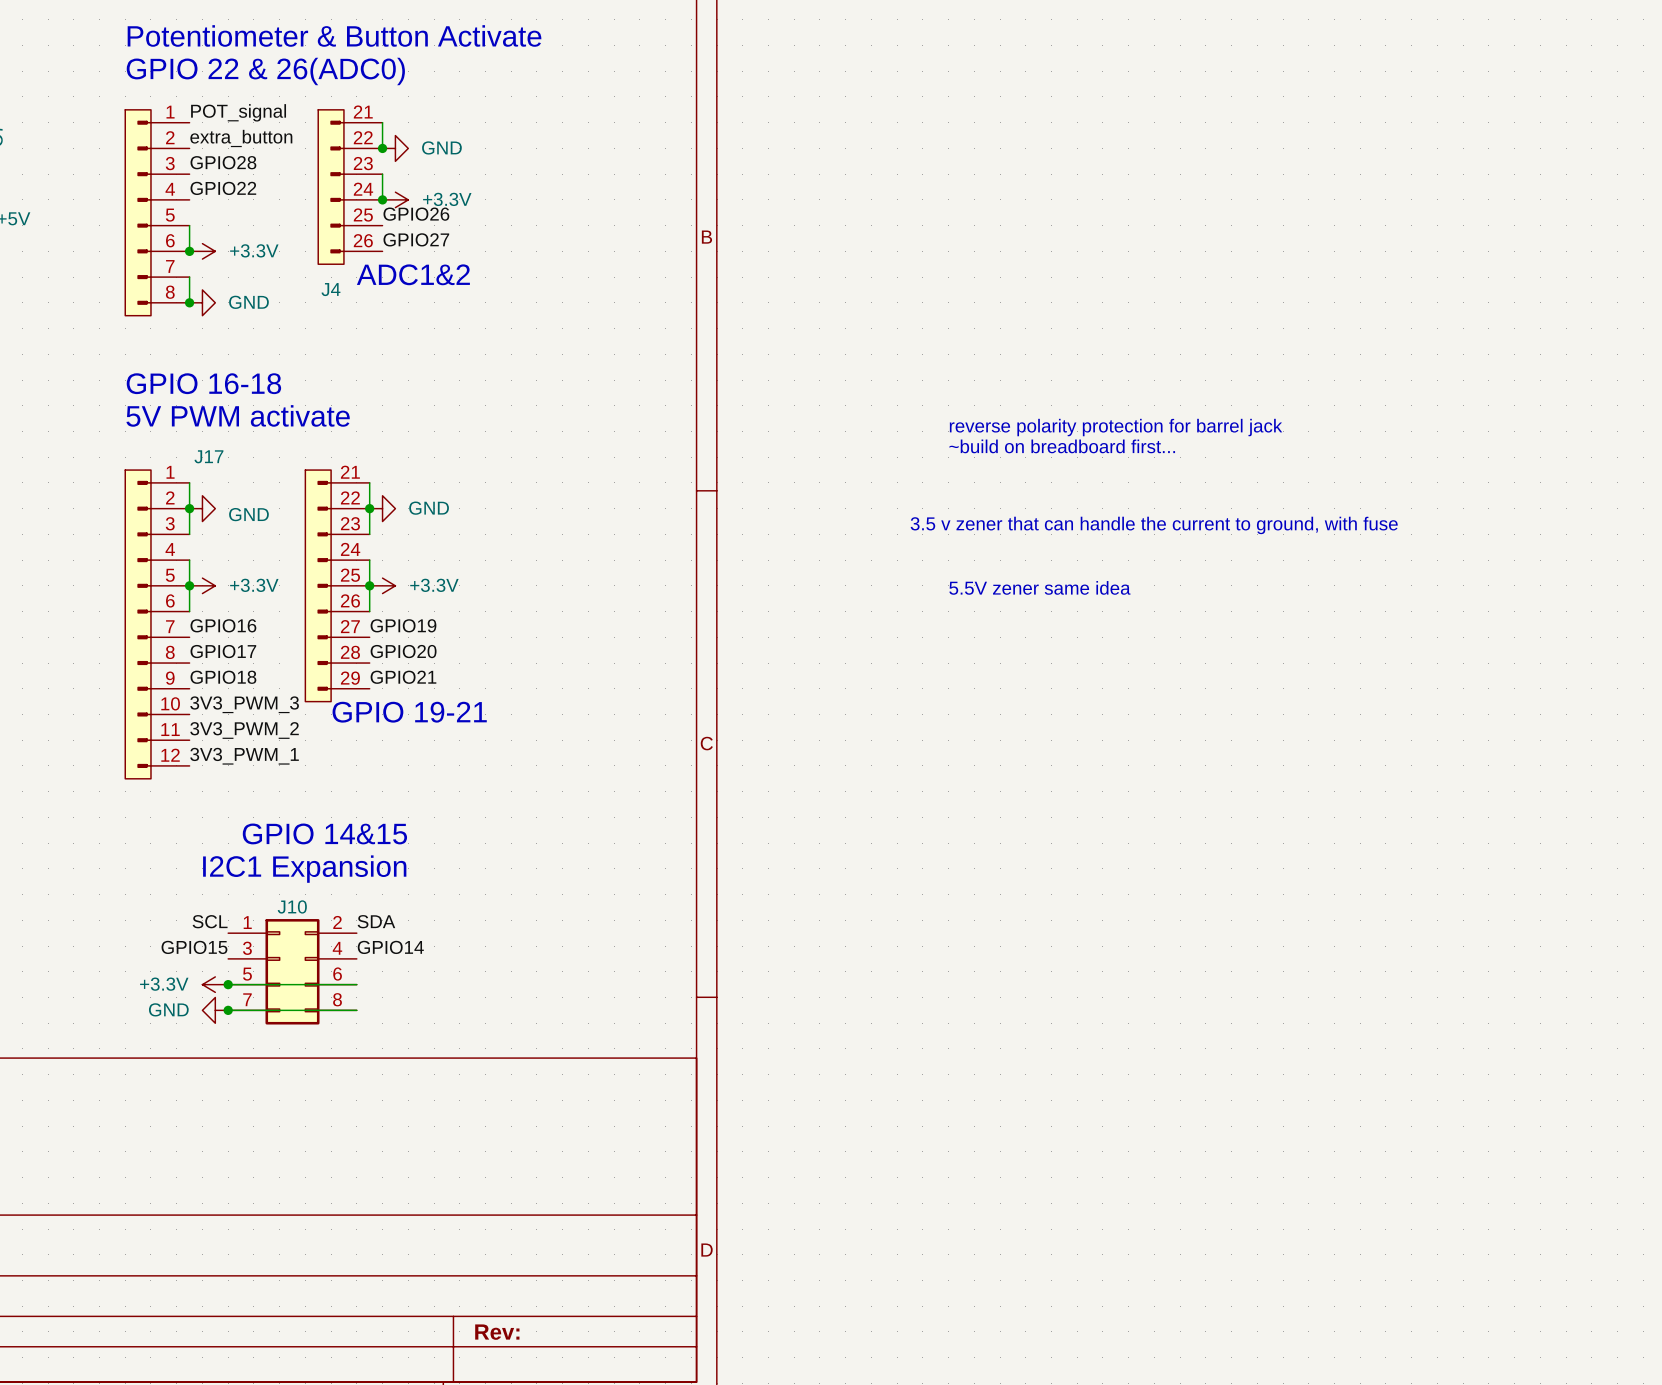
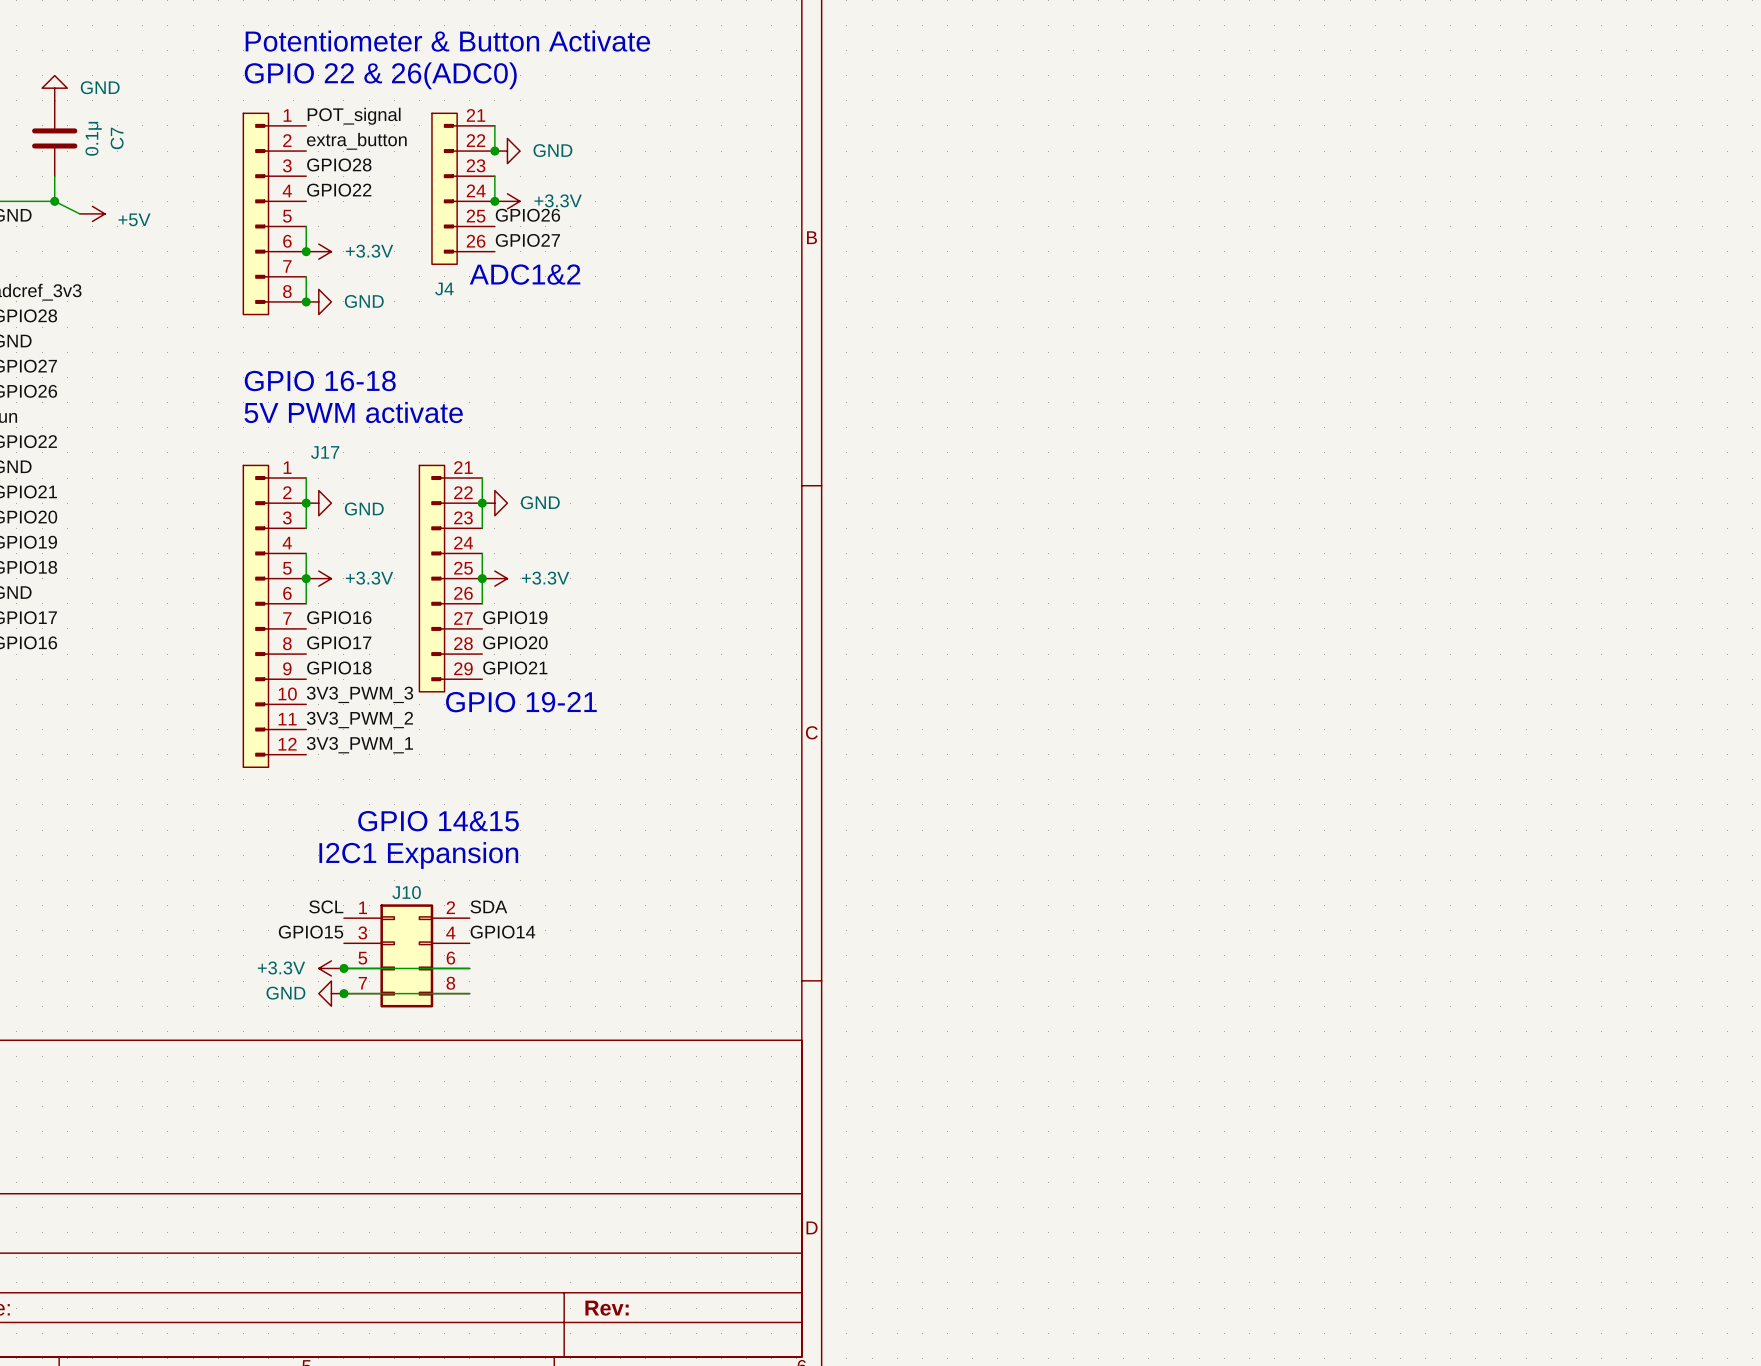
text: reverse polarity protection for barrel jack (1116, 427) -> none
text: ~build on breadboard first... (1062, 446) -> none
text: 3.5 v zener that can handle the current to ground, with fuse (1154, 525) -> none
text: 5.5V zener same idea (1039, 587) -> none

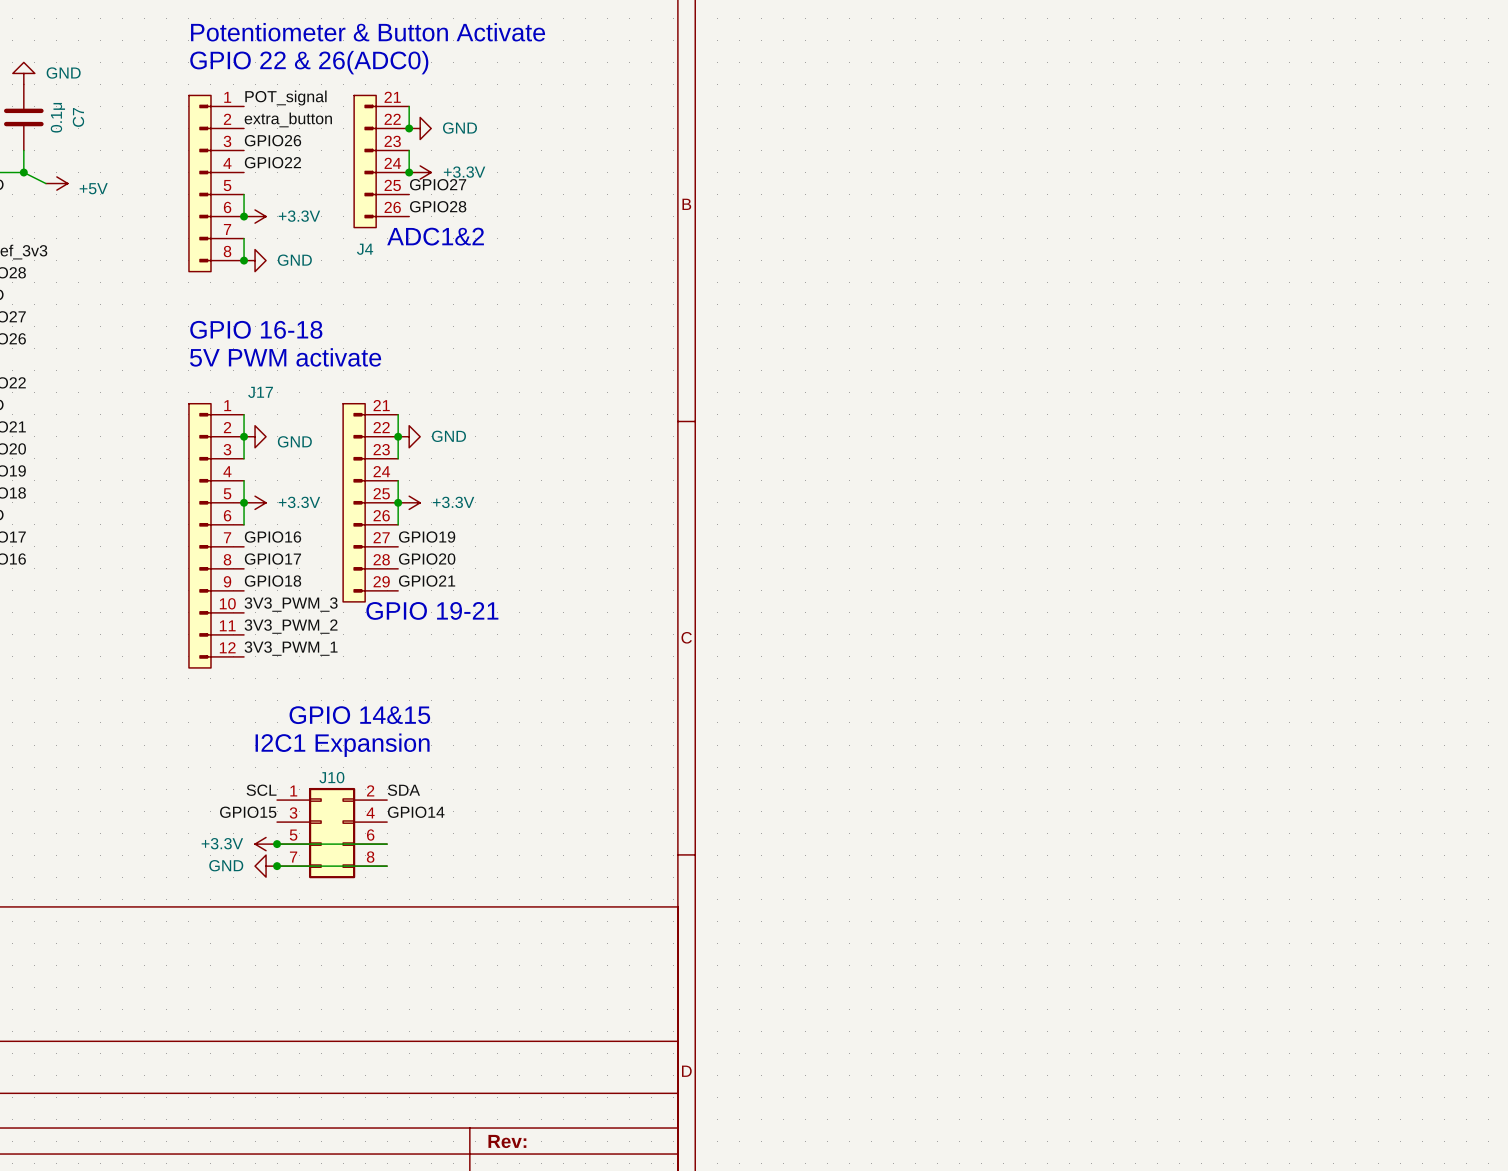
label: GPIO28 (339, 164) -> GPIO26 (272, 140)
label: GPIO26 (527, 215) -> GPIO27 (438, 184)
label: GPIO27 (527, 240) -> GPIO28 (438, 206)

